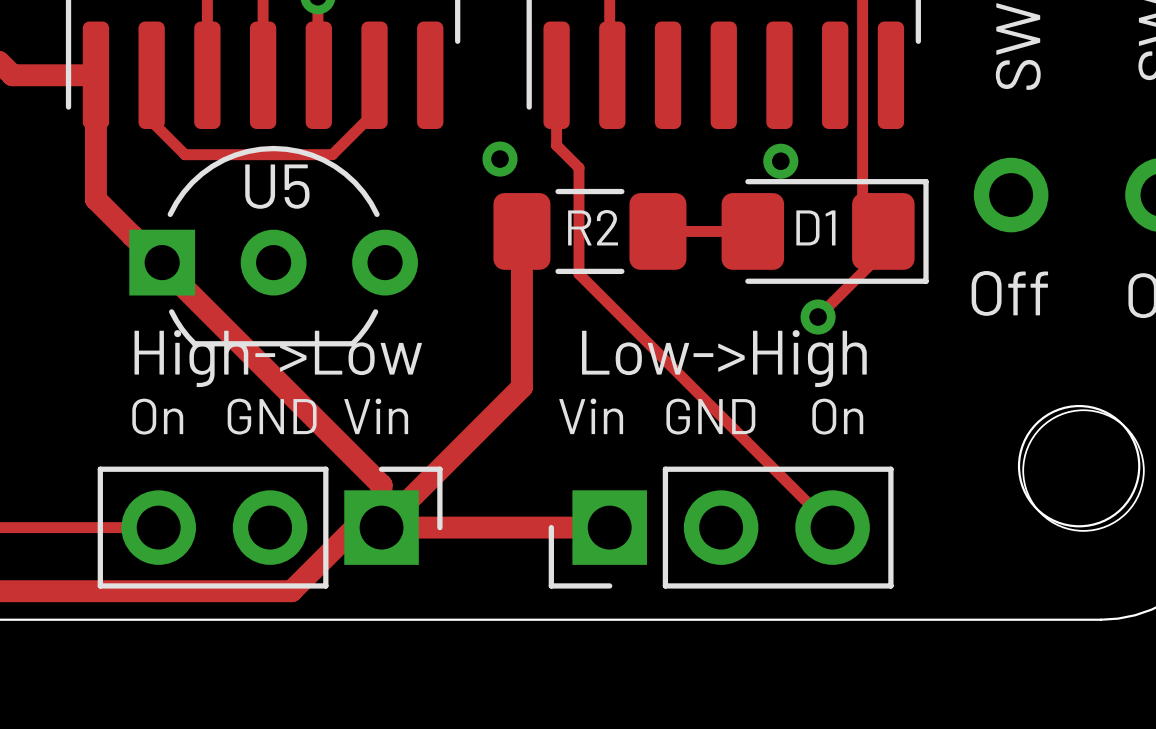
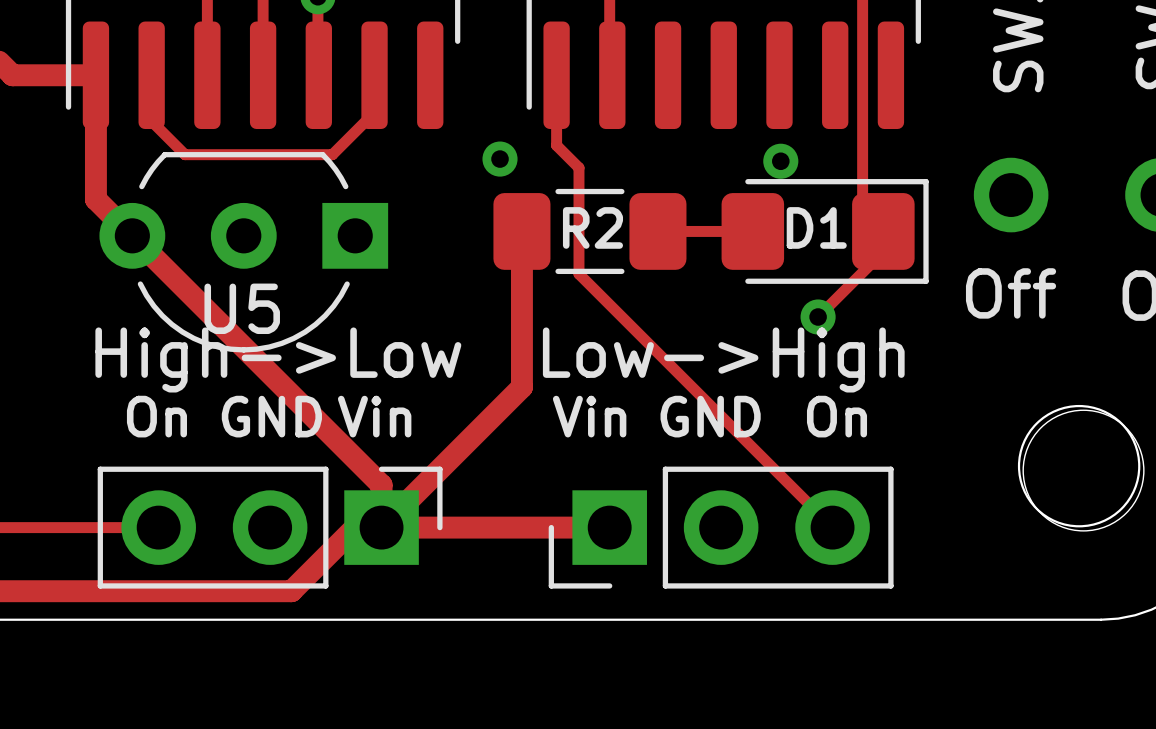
U5 rotation: 0° (273, 246) -> 180° (243, 252)

